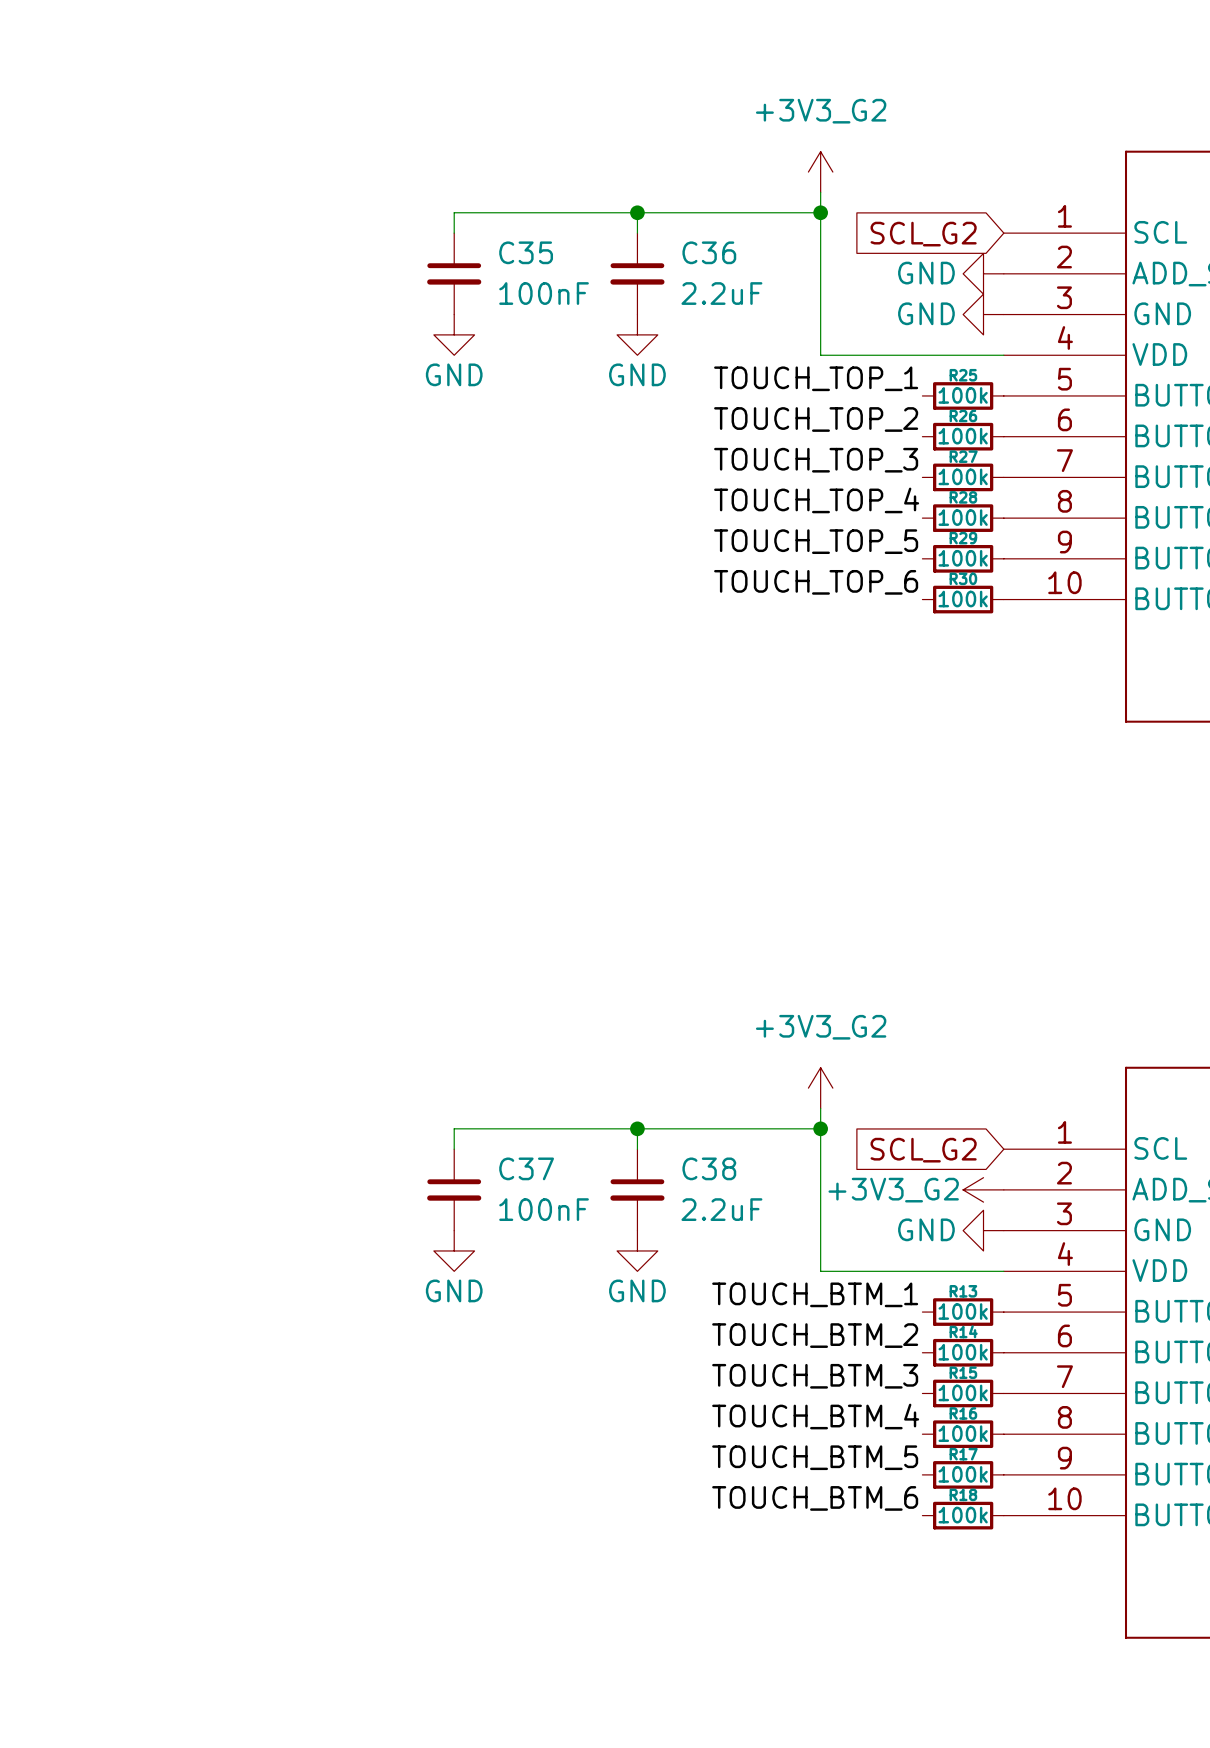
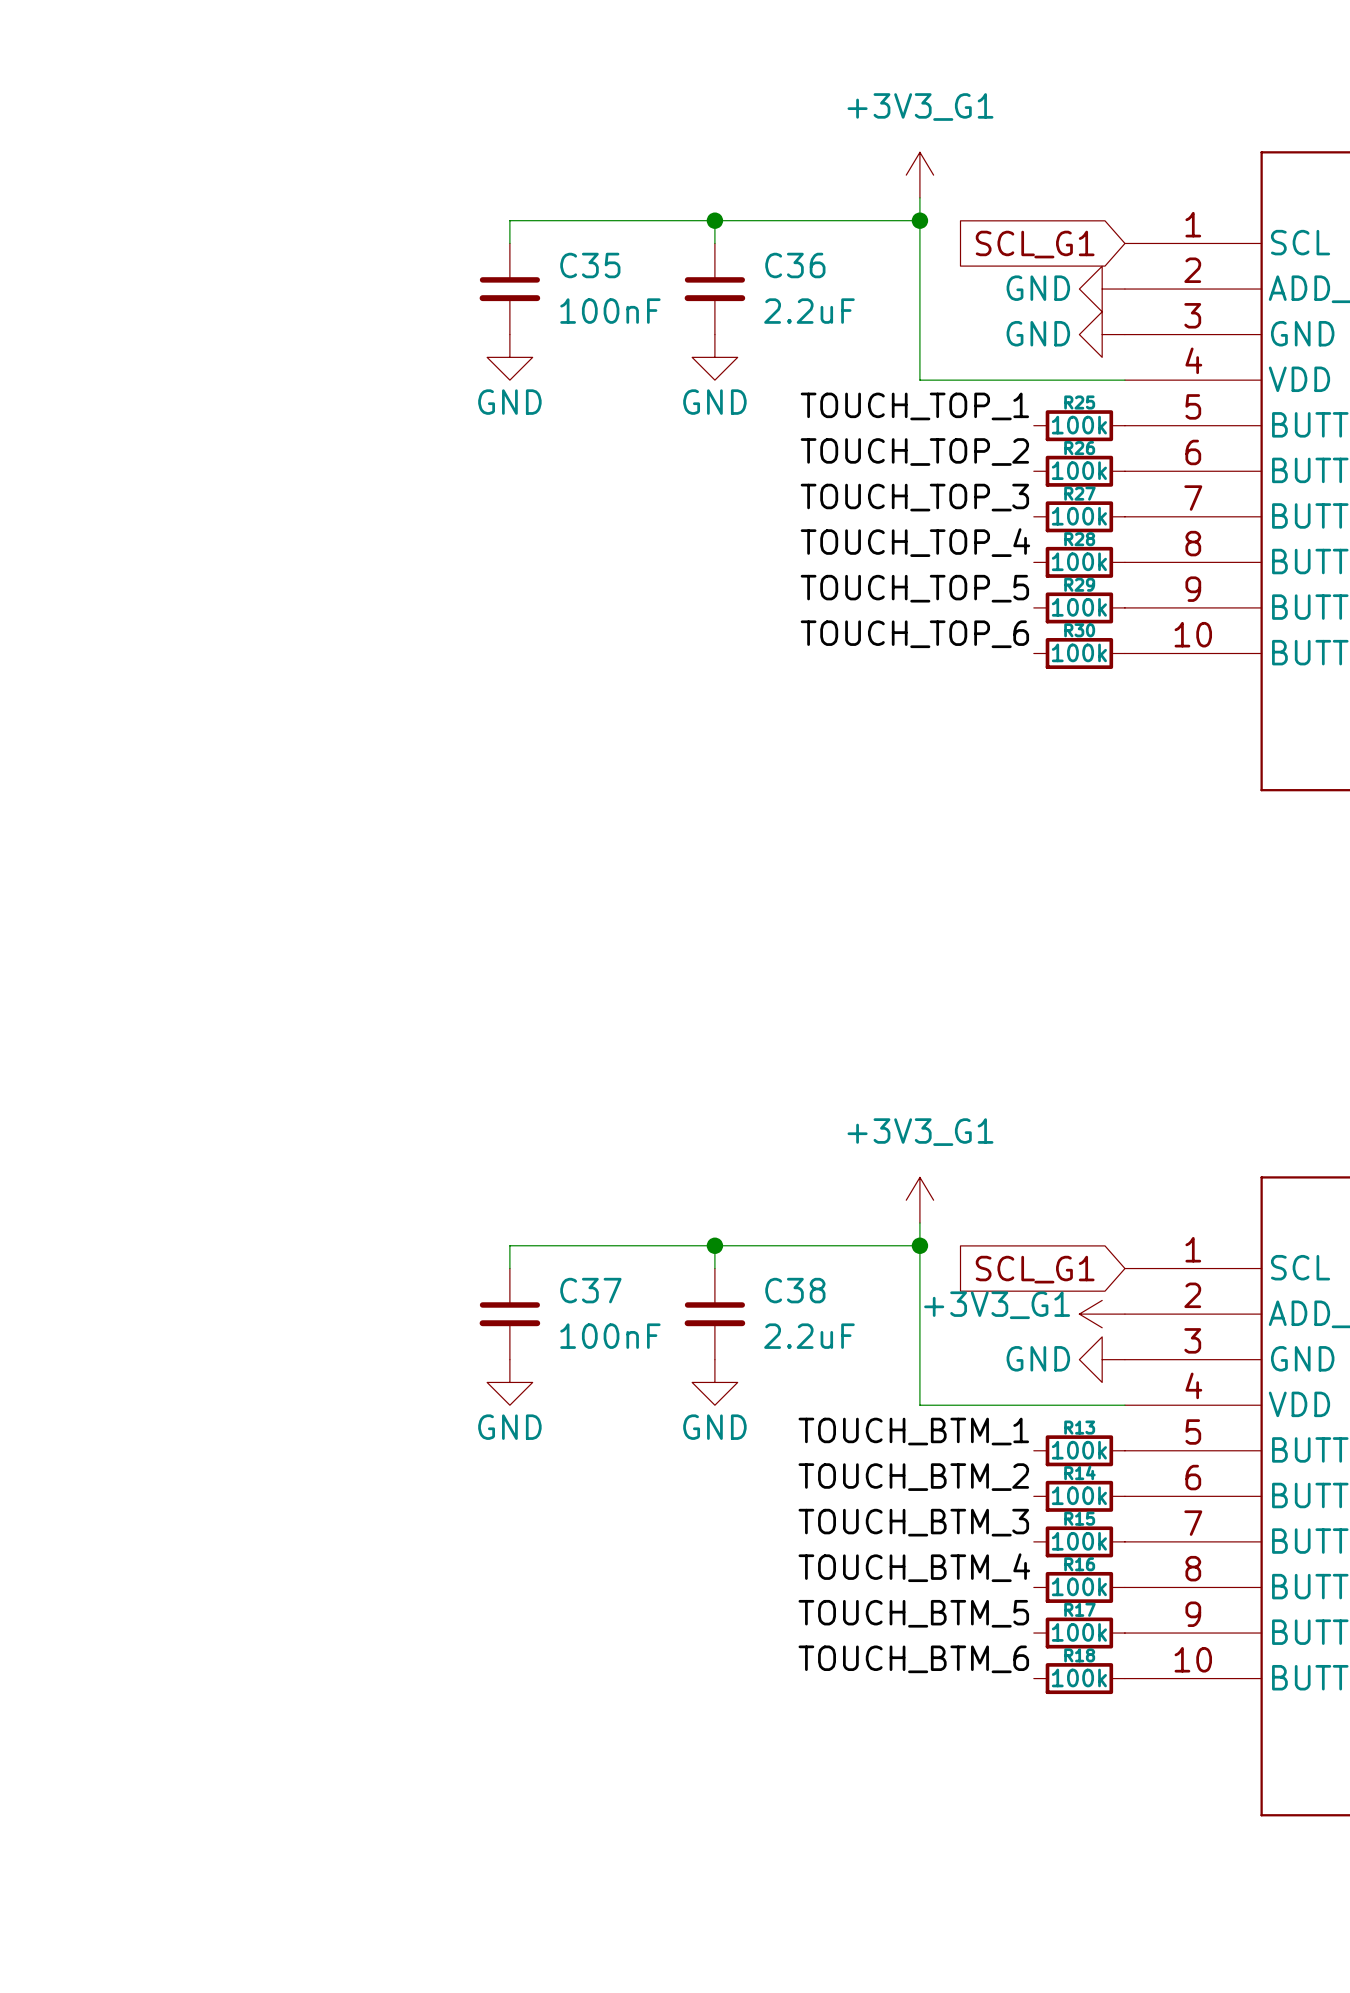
power symbol: +3V3_G2 (820, 172) -> +3V3_G1 (919, 175)
global label: SCL_G2 (923, 234) -> SCL_G1 (1035, 244)
power symbol: +3V3_G2 (820, 1088) -> +3V3_G1 (919, 1200)
global label: SCL_G2 (923, 1150) -> SCL_G1 (1035, 1269)
power symbol: +3V3_G2 (983, 1189) -> +3V3_G1 (1102, 1314)

